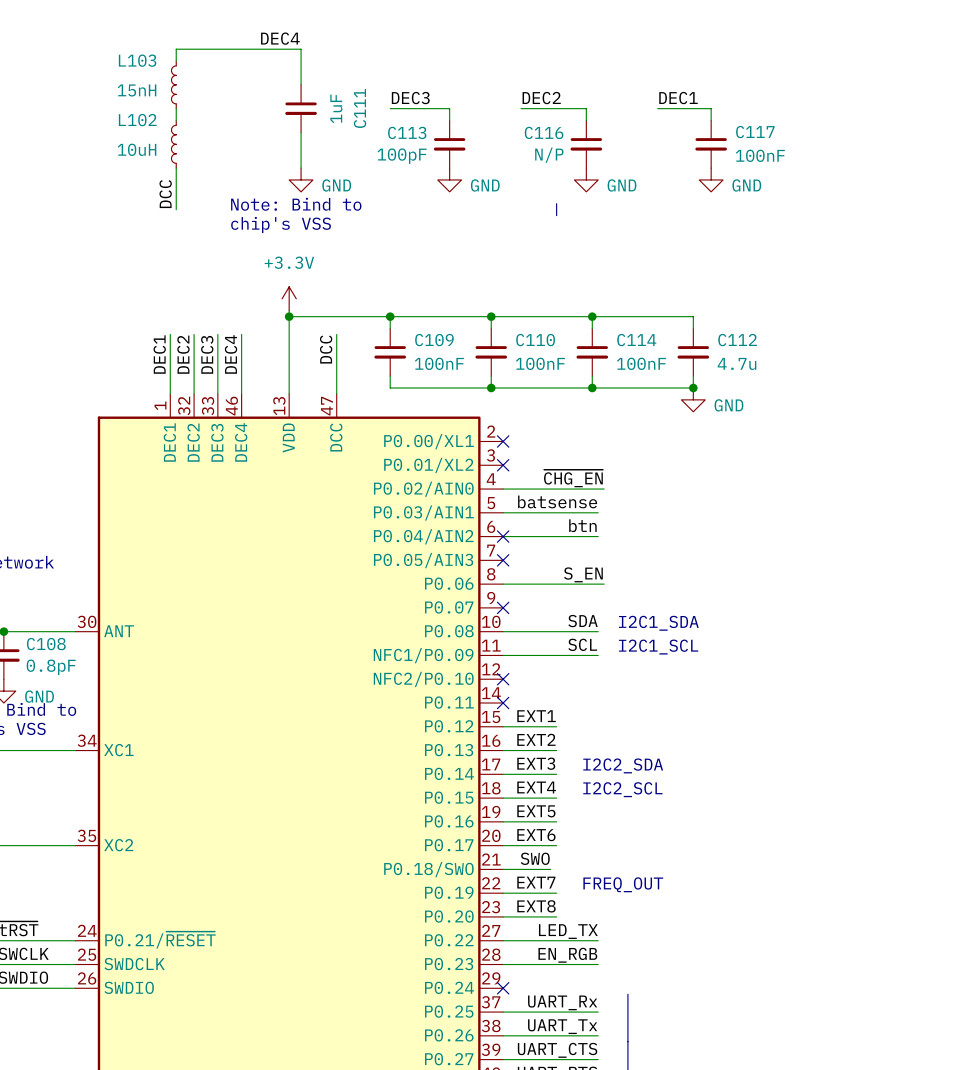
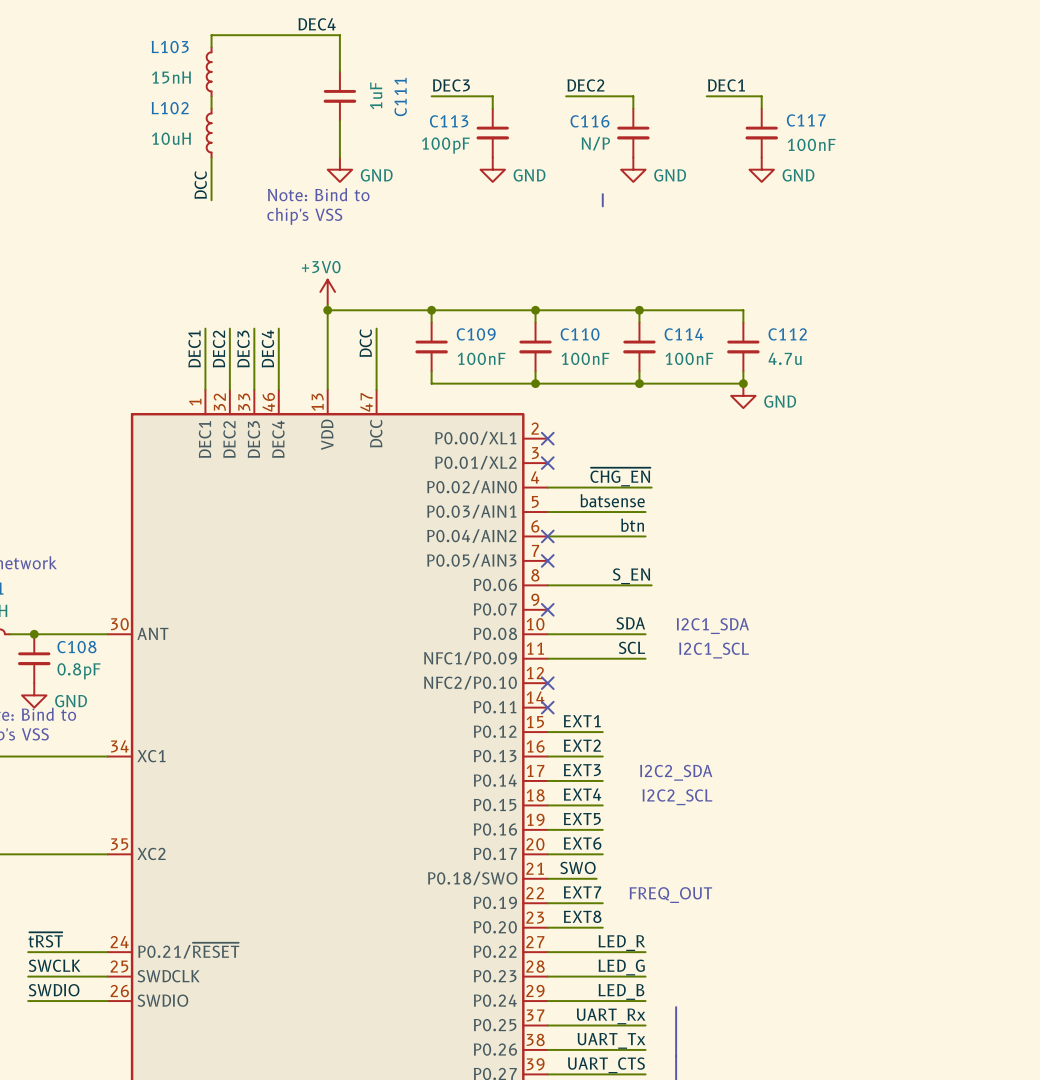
power symbol: +3.3V (289, 298) -> +3V0 (327, 291)
label: LED_TX (568, 931) -> LED_R (621, 943)
label: EN_RGB (567, 955) -> LED_G (621, 967)
label: none -> LED_B (621, 991)
wire: none -> (547, 1001) (645, 1001)
no-connect mark: (503, 988) -> none

